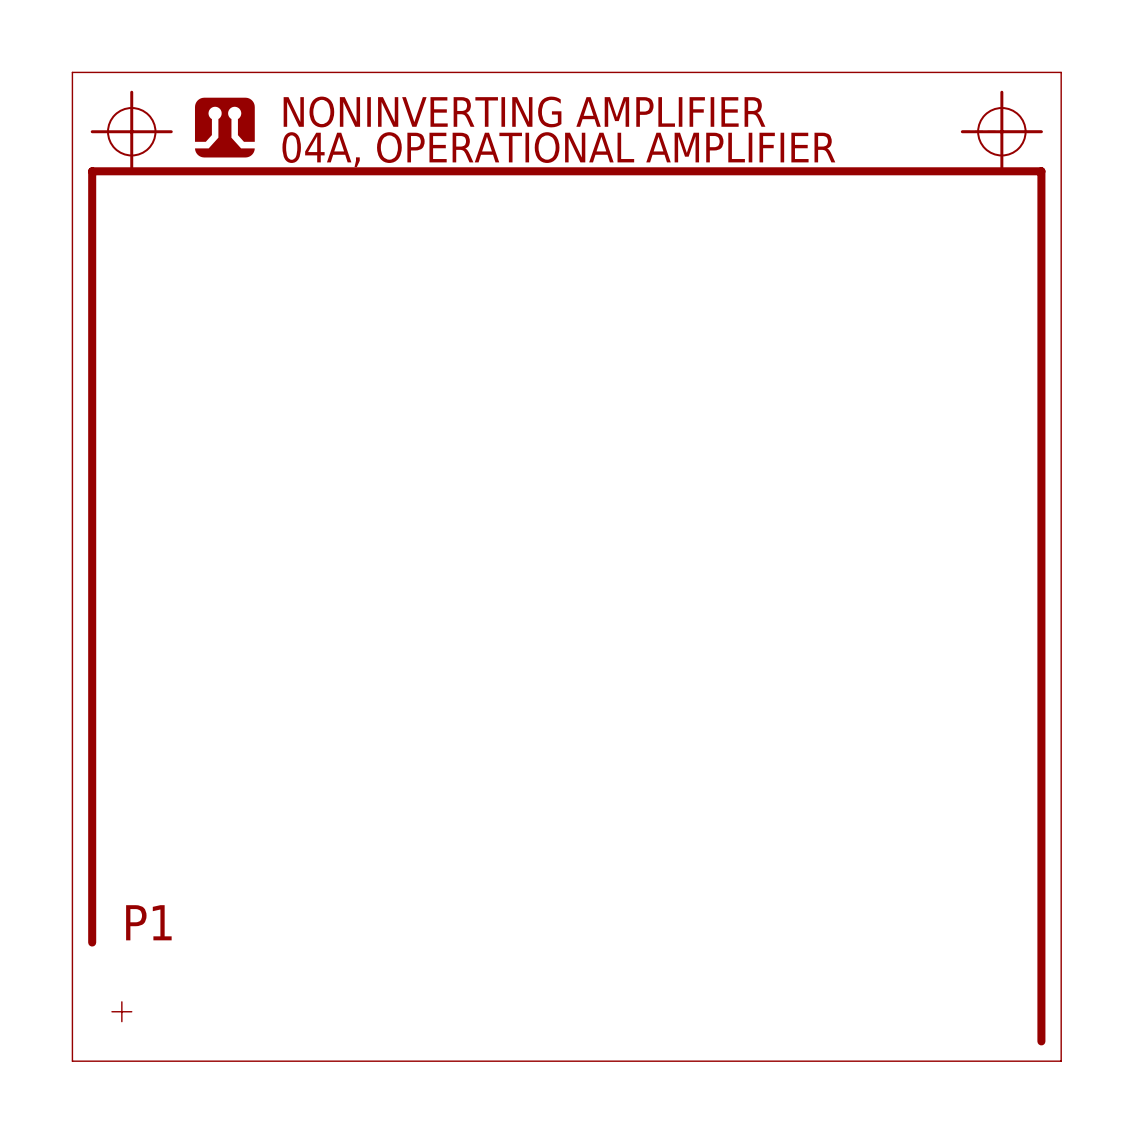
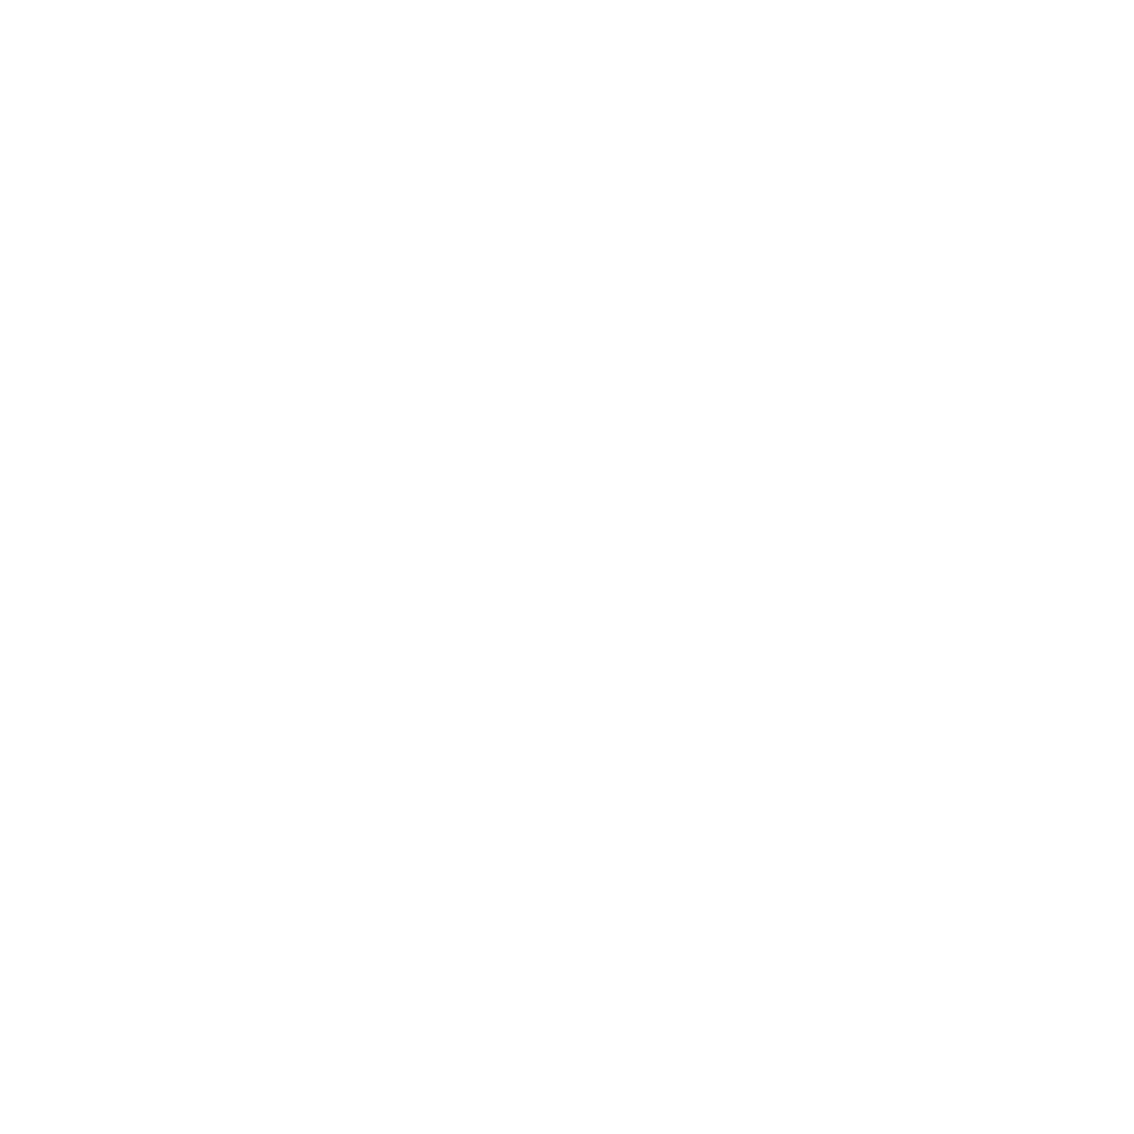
part: (566, 566) -> none

